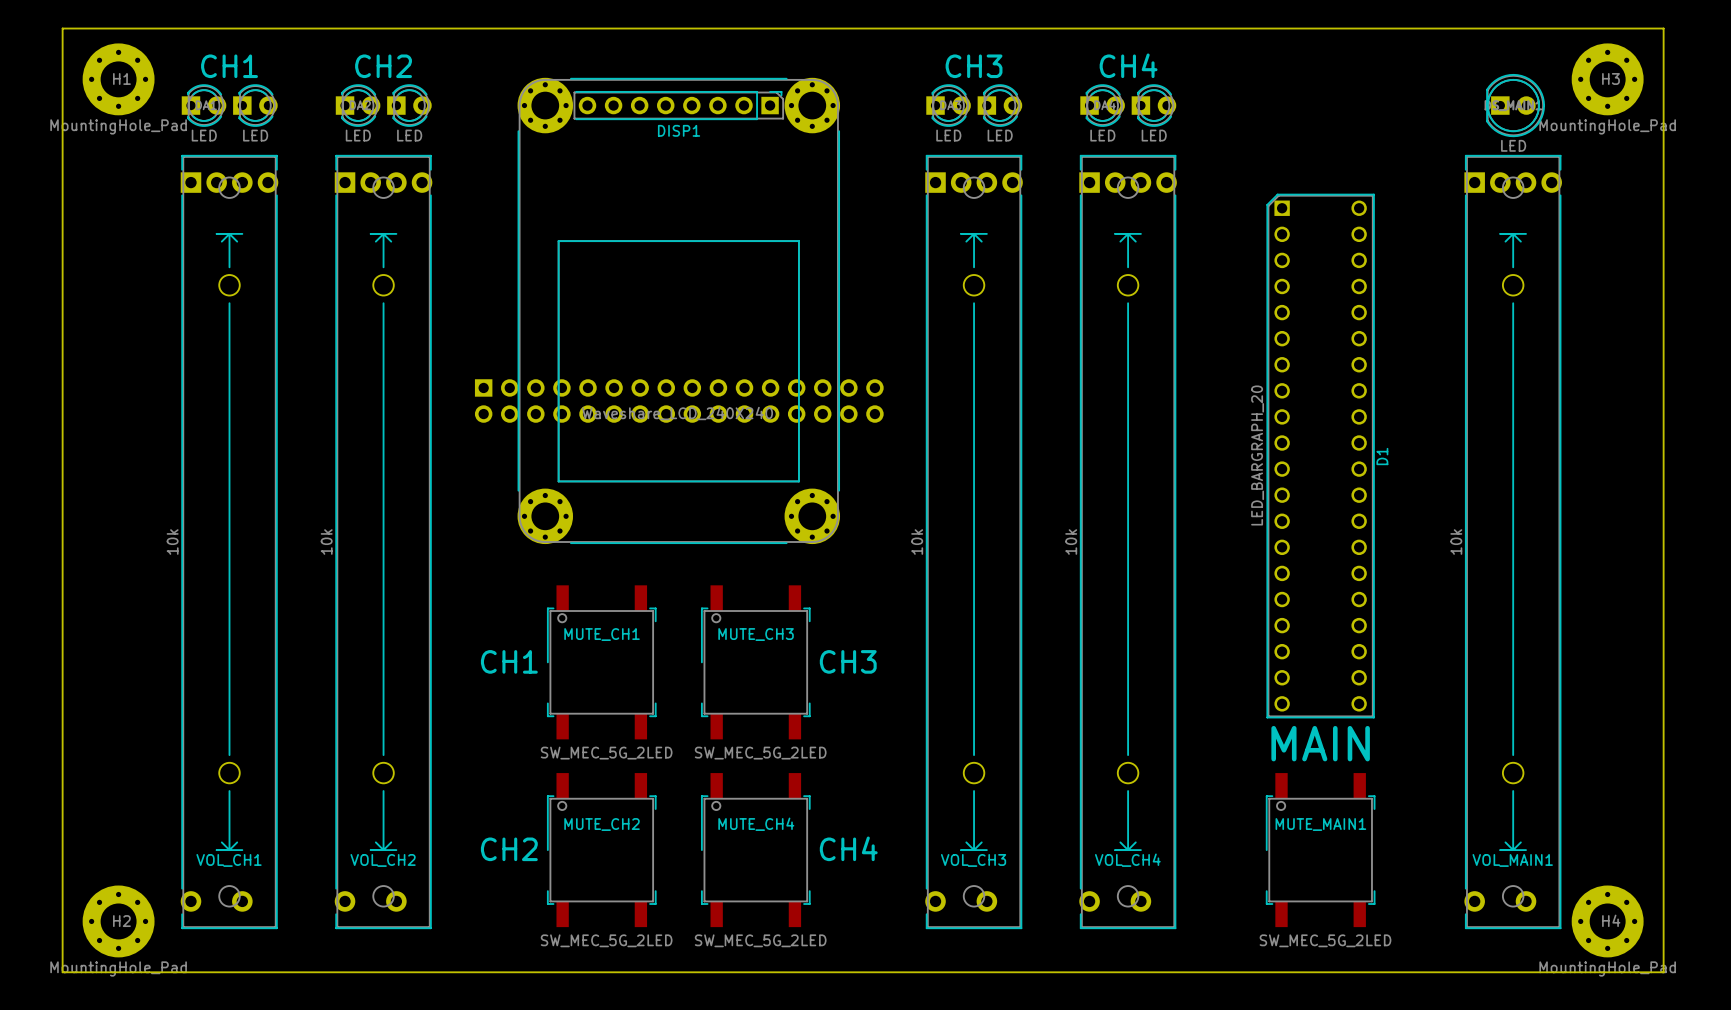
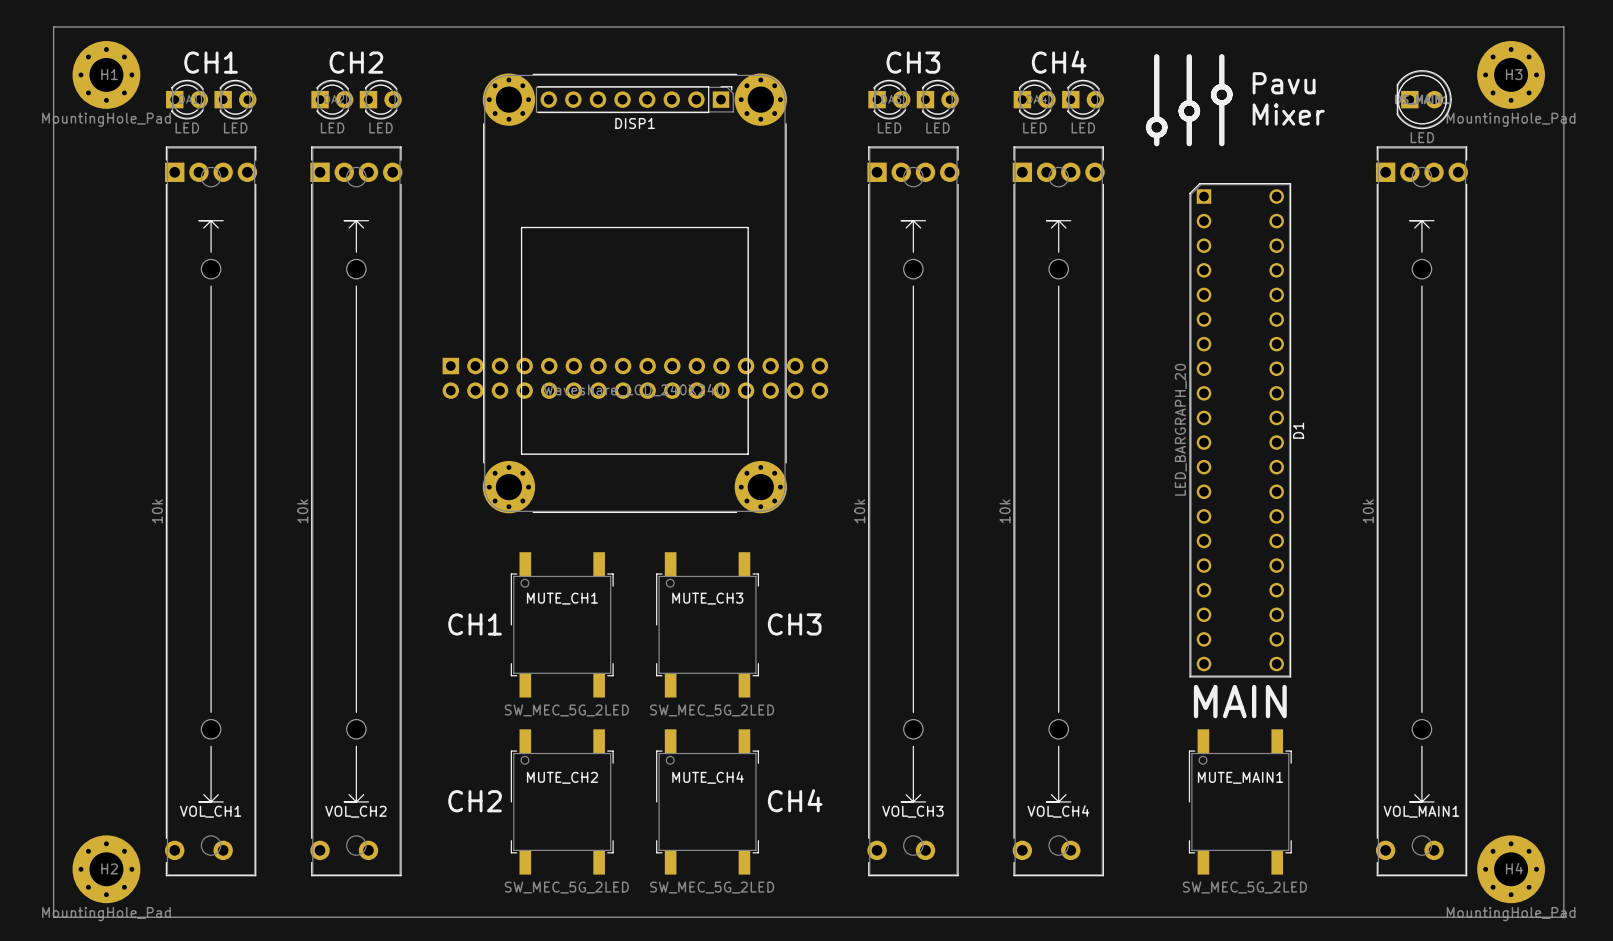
line: none -> (1156, 56) (1156, 116)
line: none -> (1189, 56) (1189, 100)
line: none -> (1221, 56) (1221, 83)
text: none -> Pavu (1284, 83)
line: none -> (1221, 86) (1227, 89) (1229, 94) (1227, 100) (1221, 102) (1216, 100) (1213, 94) (1216, 89) (1221, 86)
line: none -> (1189, 102) (1183, 105) (1181, 111) (1183, 116) (1189, 119) (1195, 116) (1197, 111) (1195, 105) (1189, 102)
line: none -> (1221, 105) (1221, 143)
text: none -> Mixer (1288, 114)
line: none -> (1156, 119) (1150, 121) (1148, 127) (1150, 133) (1156, 135) (1162, 133) (1164, 127) (1162, 121) (1156, 119)
line: none -> (1189, 121) (1189, 143)
line: none -> (1156, 138) (1156, 143)

